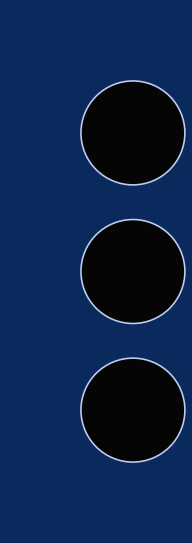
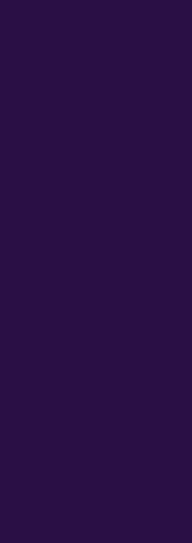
part: (132, 132) -> none
part: (132, 271) -> none
part: (132, 410) -> none

